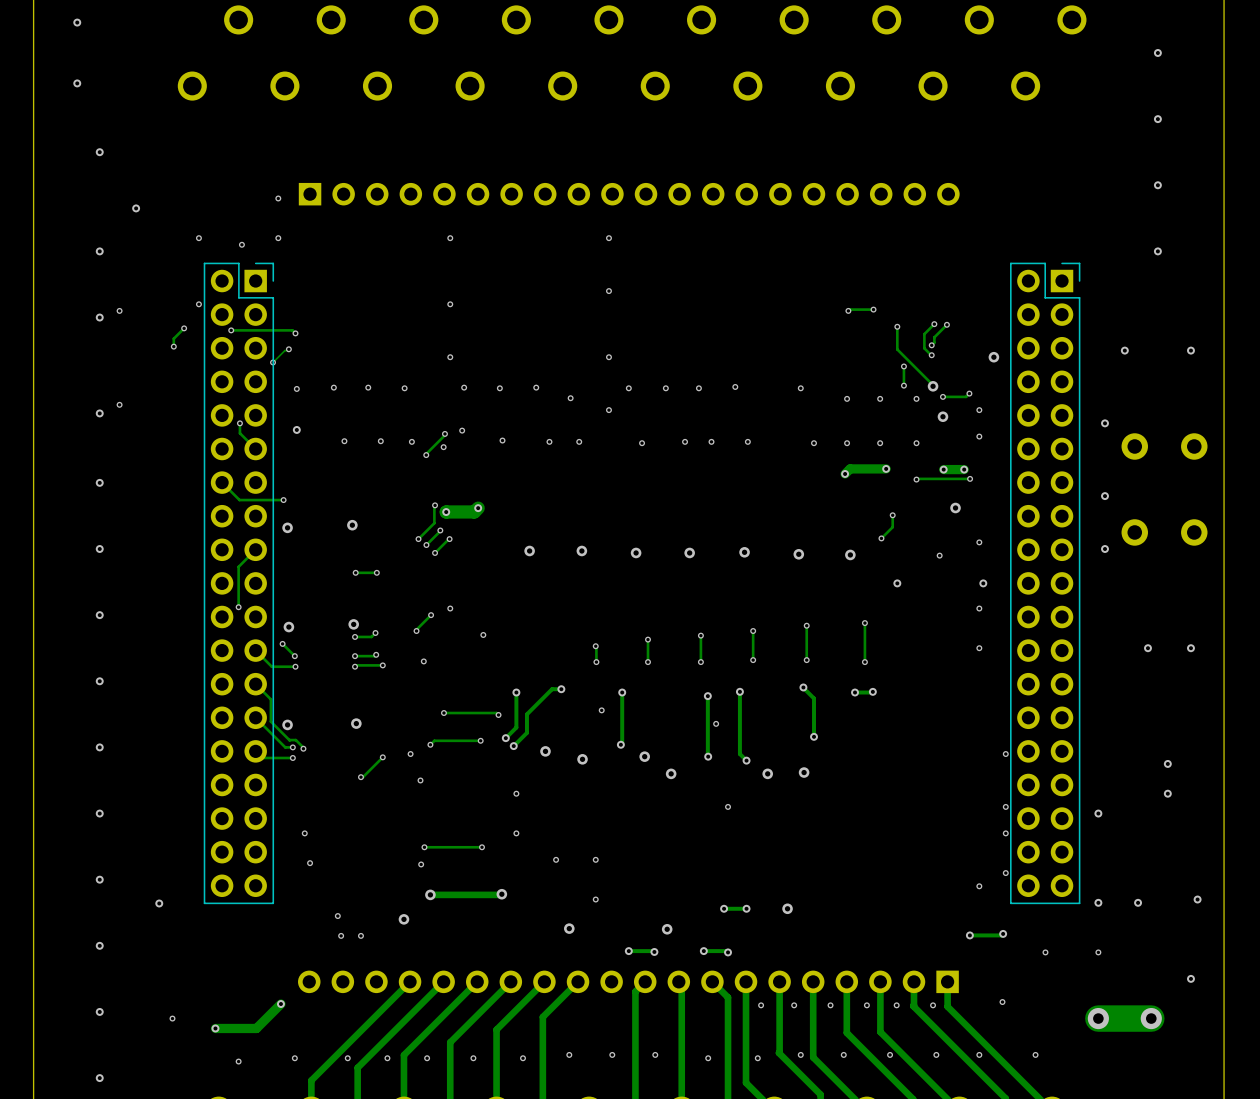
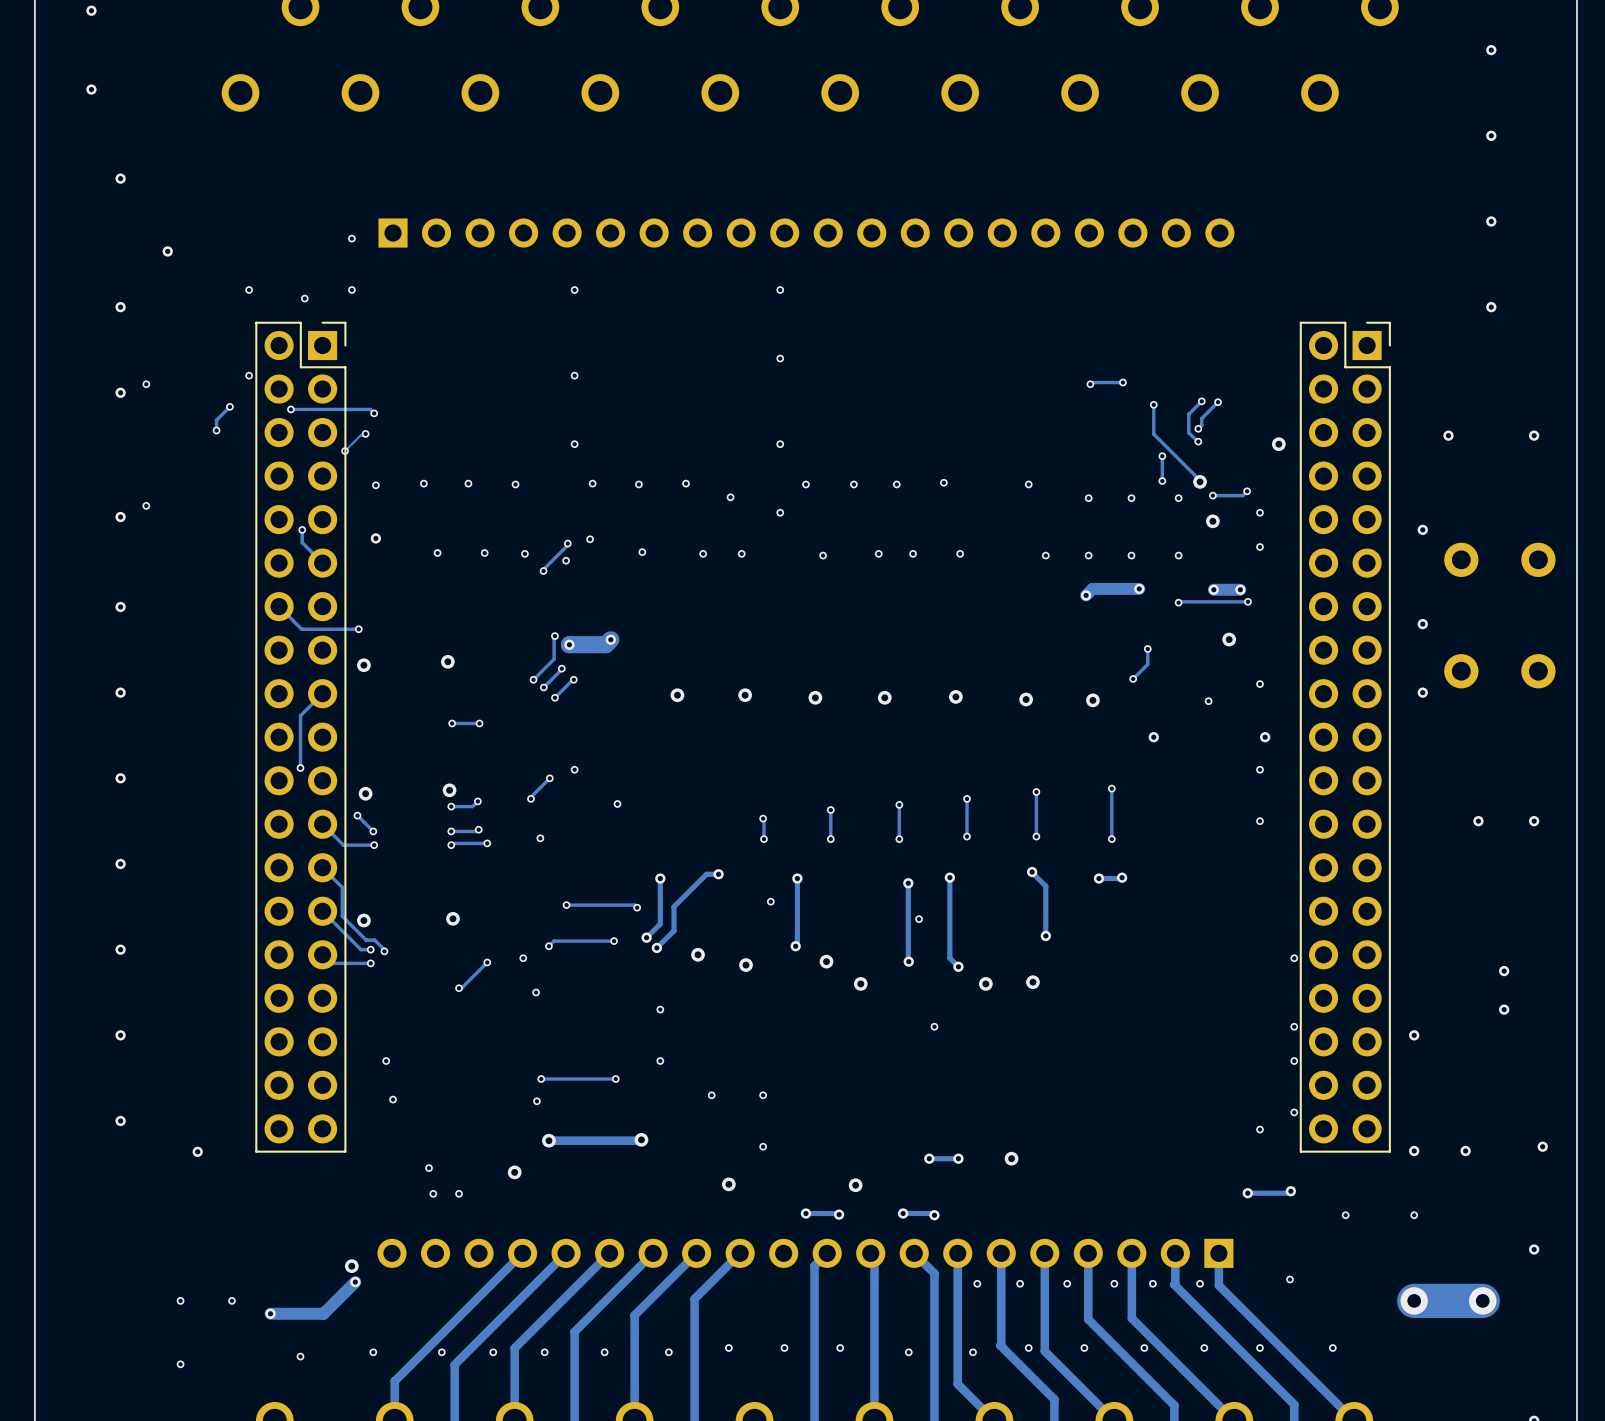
via: (99, 945) -> none
via: none -> (351, 1266)
via: (99, 1011) -> none
via: none -> (180, 1300)
via: (172, 1018) -> none
via: none -> (231, 1300)
via: none -> (180, 1364)
via: (99, 1078) -> none

